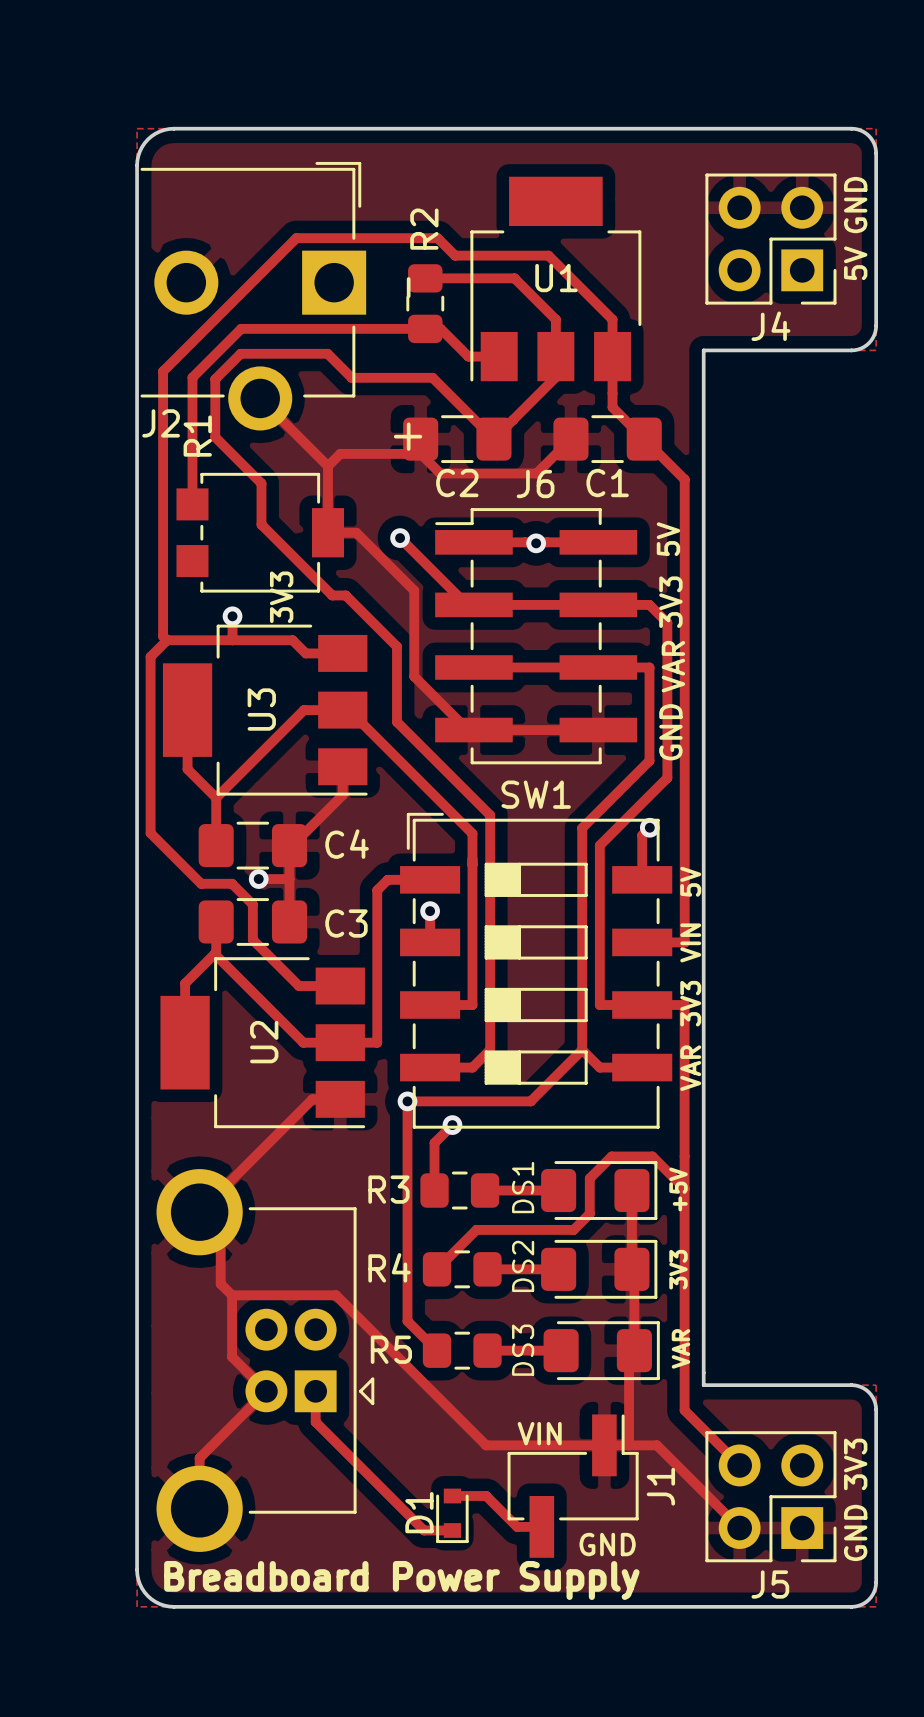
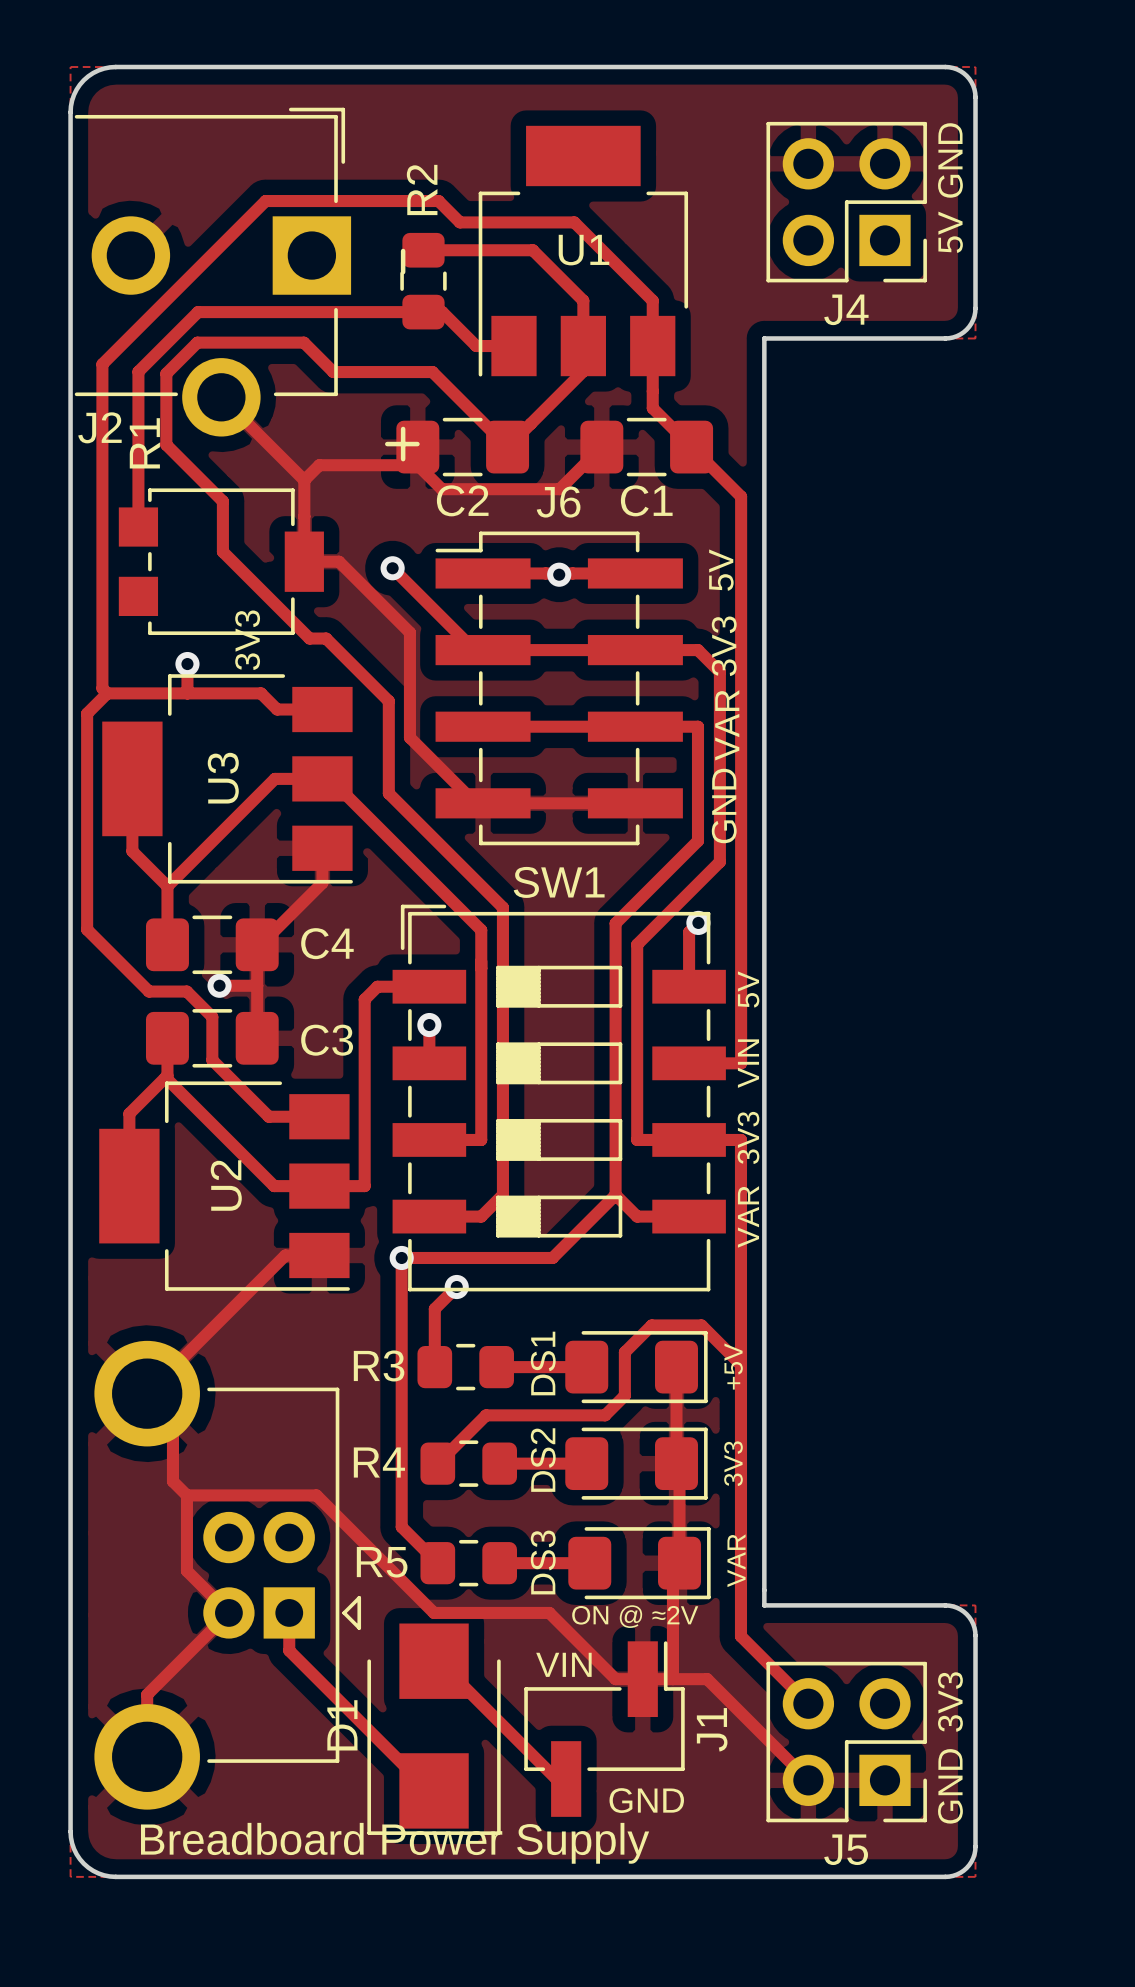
track: (336, 1295) (486, 1445) (582, 1445) -> (314, 1495) (316, 1495) (434, 1612) (549, 1612) (615, 1679)
text: none -> ON @ ≈2V (635, 1616)
D1 footprint: [436, 1488, 469, 1544] -> [367, 1623, 501, 1835]
track: (452, 1496) (486, 1496) (517, 1526) (533, 1526) -> (435, 1655) (435, 1658) (556, 1779)

